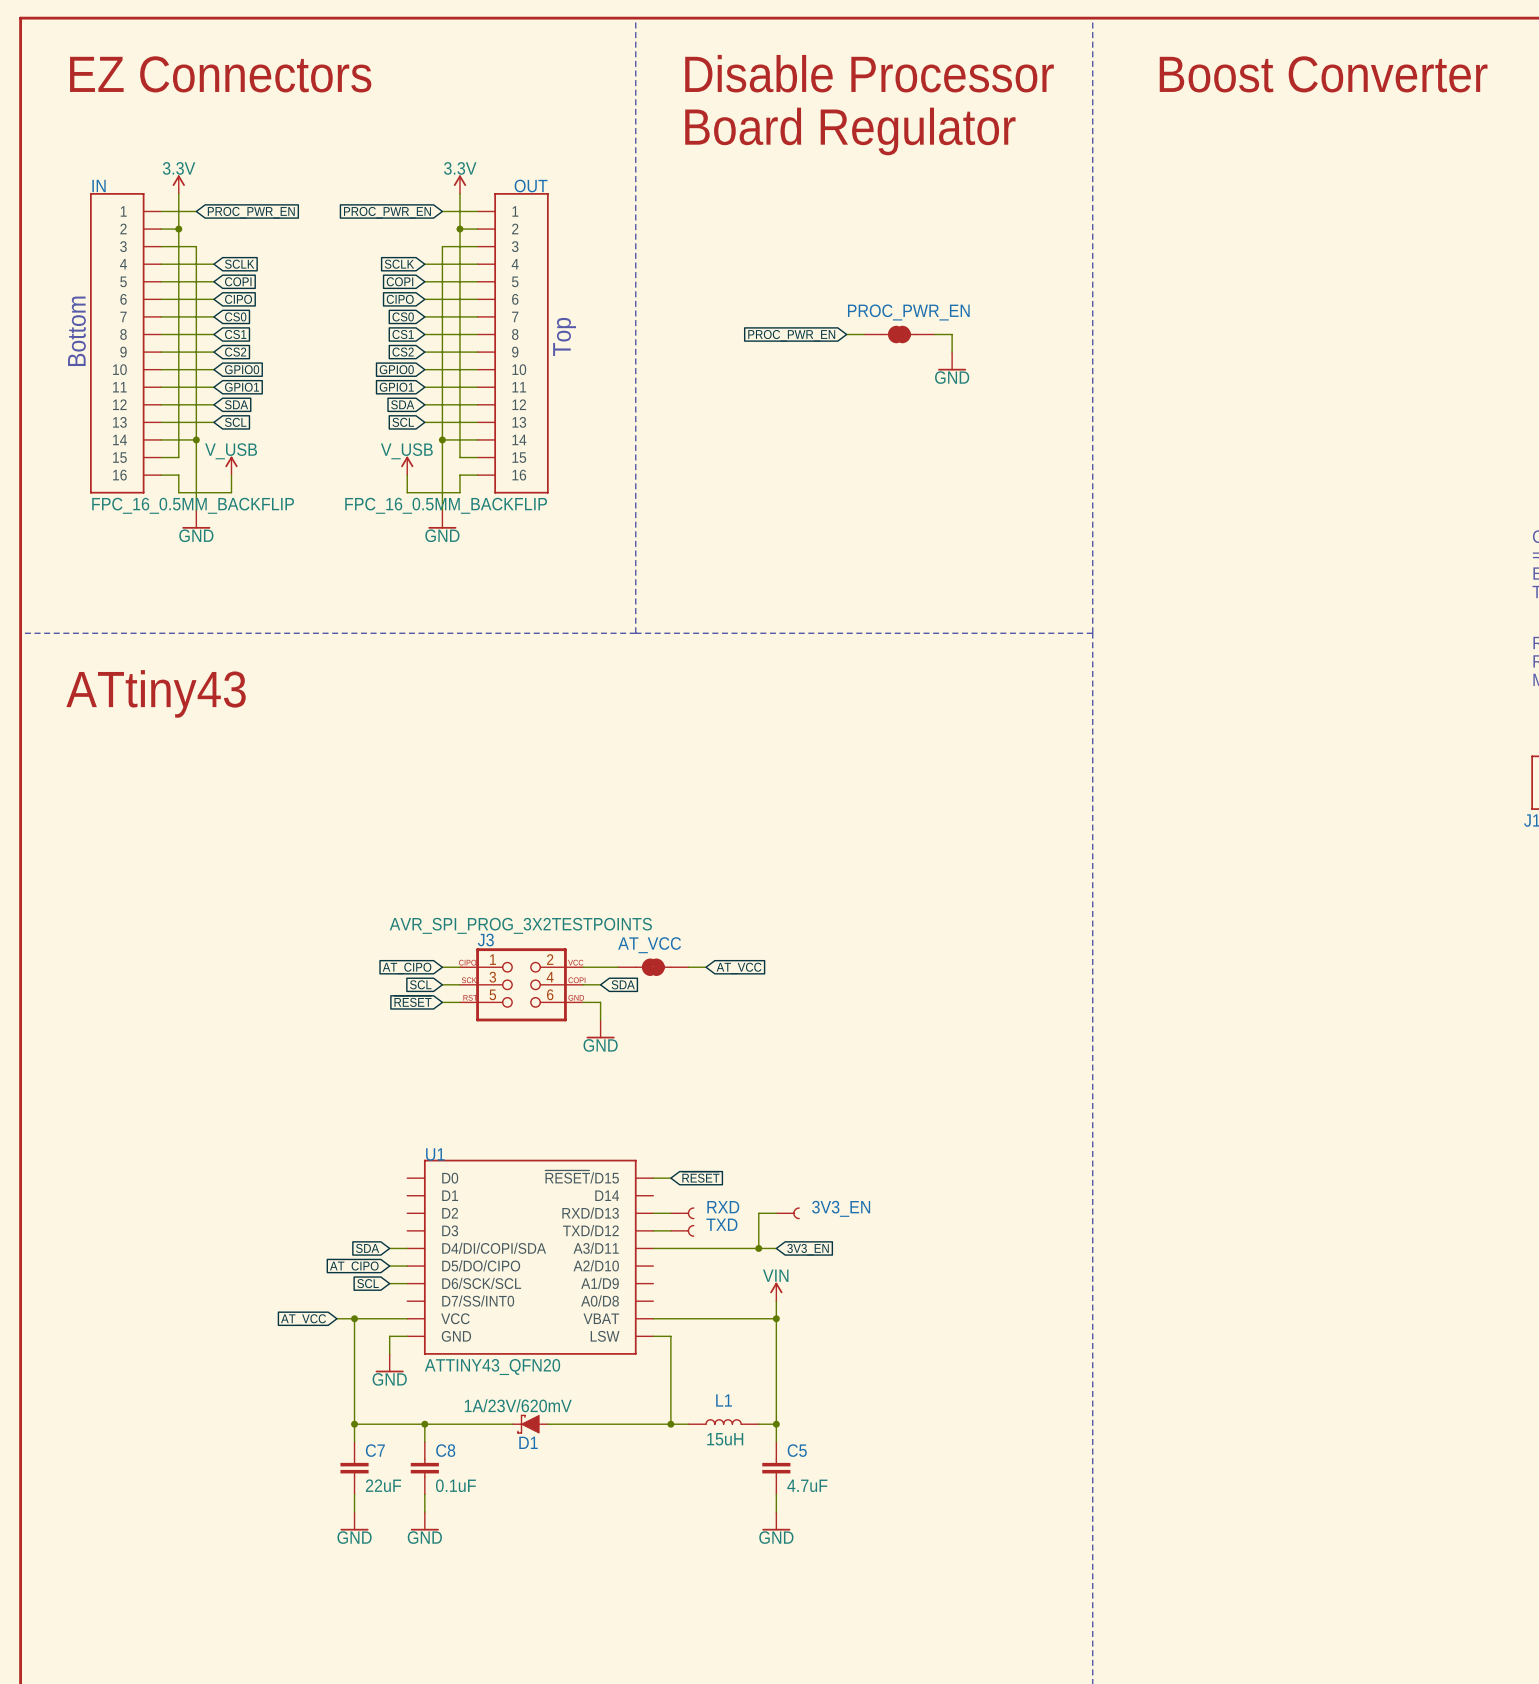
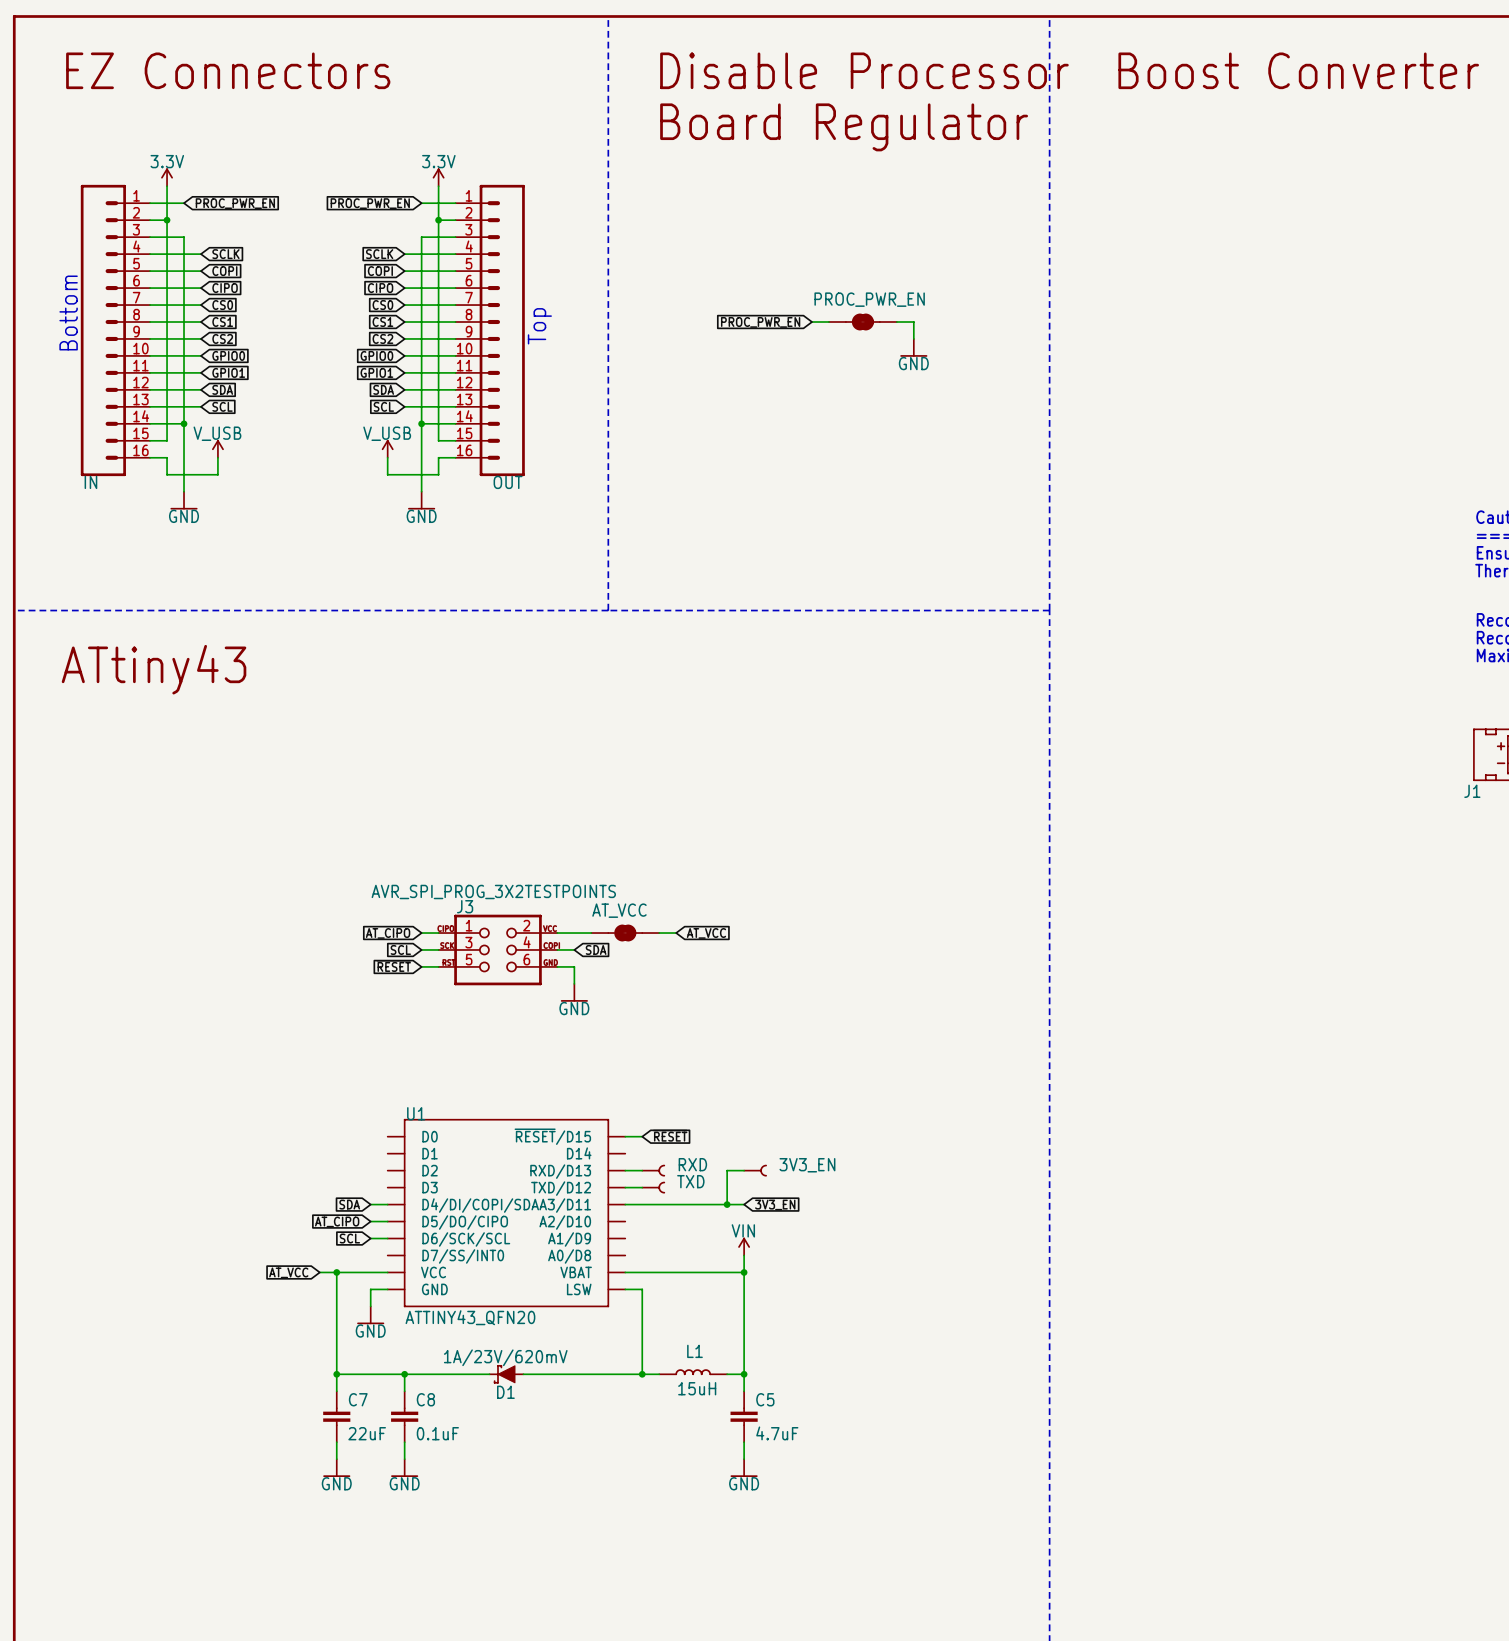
IN name position: IN (99, 185) -> IN (90, 482)
OUT name position: OUT (531, 185) -> OUT (508, 482)
IN symbol: [90, 193, 162, 494] -> [80, 184, 151, 477]
OUT symbol: [477, 193, 549, 494] -> [455, 184, 525, 477]
IN value: FPC_16_0.5MM_BACKFLIP (193, 505) -> none
OUT value: FPC_16_0.5MM_BACKFLIP (446, 505) -> none

